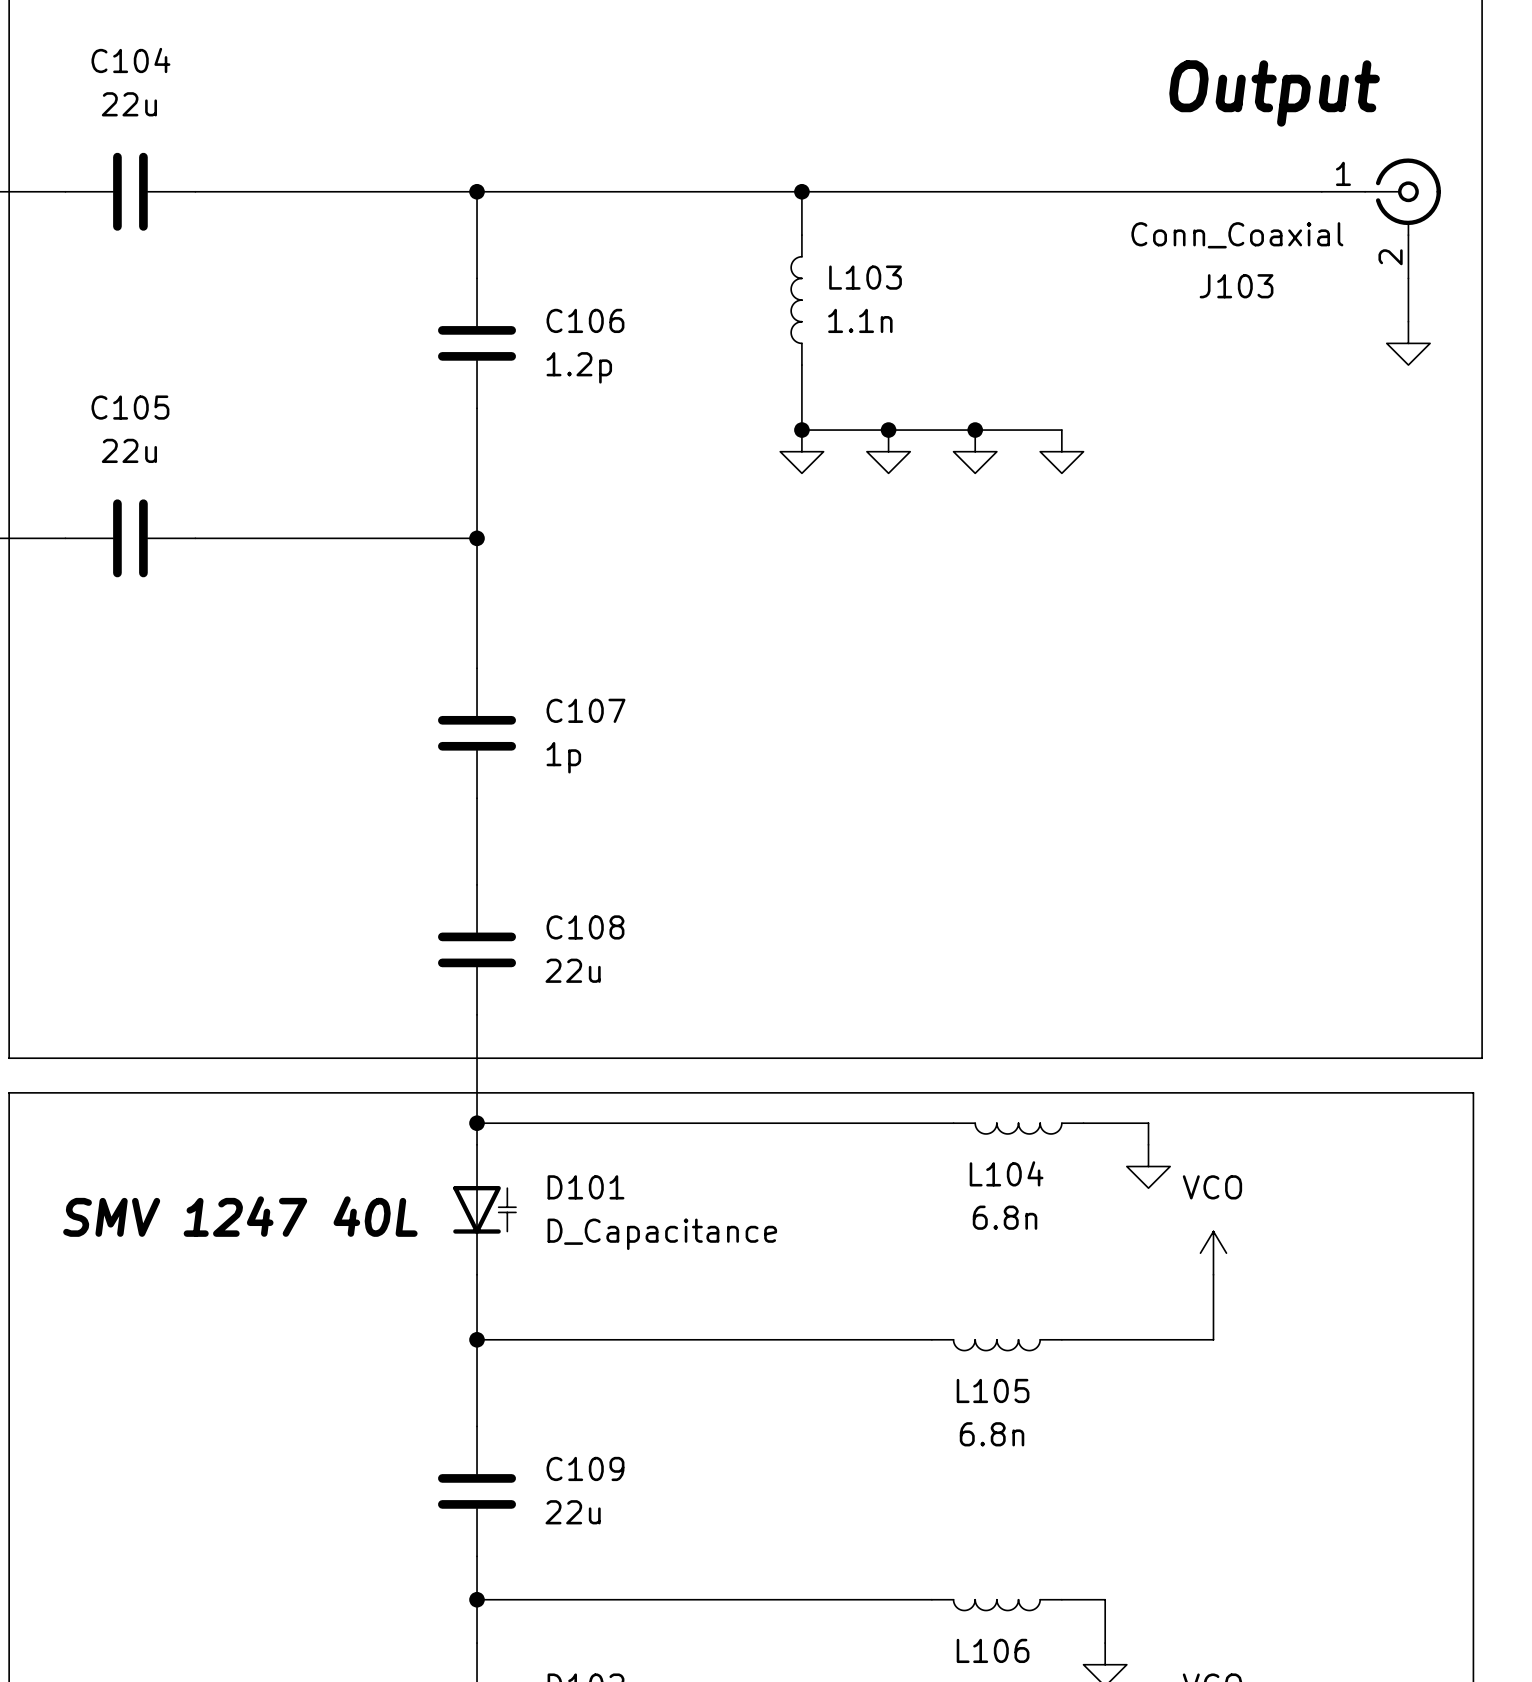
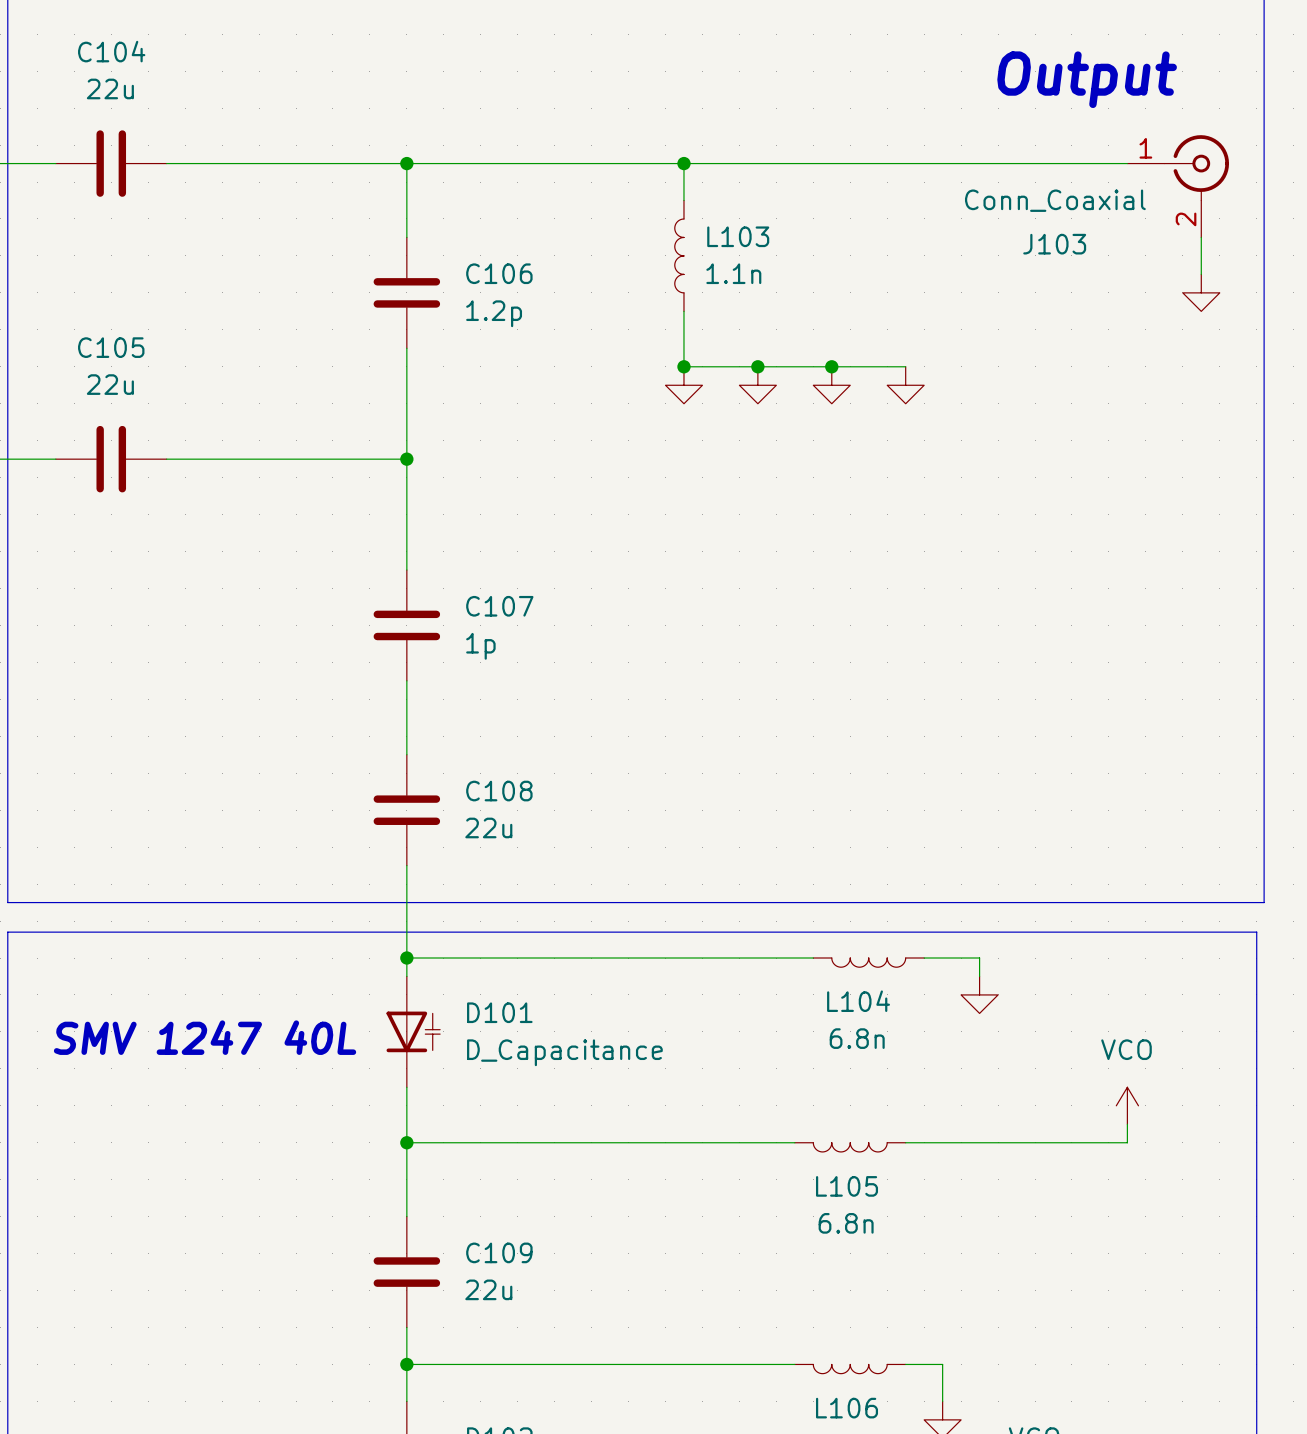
power symbol position: VCO (1213, 1253) -> VCO (1127, 1105)
wire: (1213, 1274) (1213, 1339) -> (1127, 1124) (1127, 1142) (1035, 1142)

